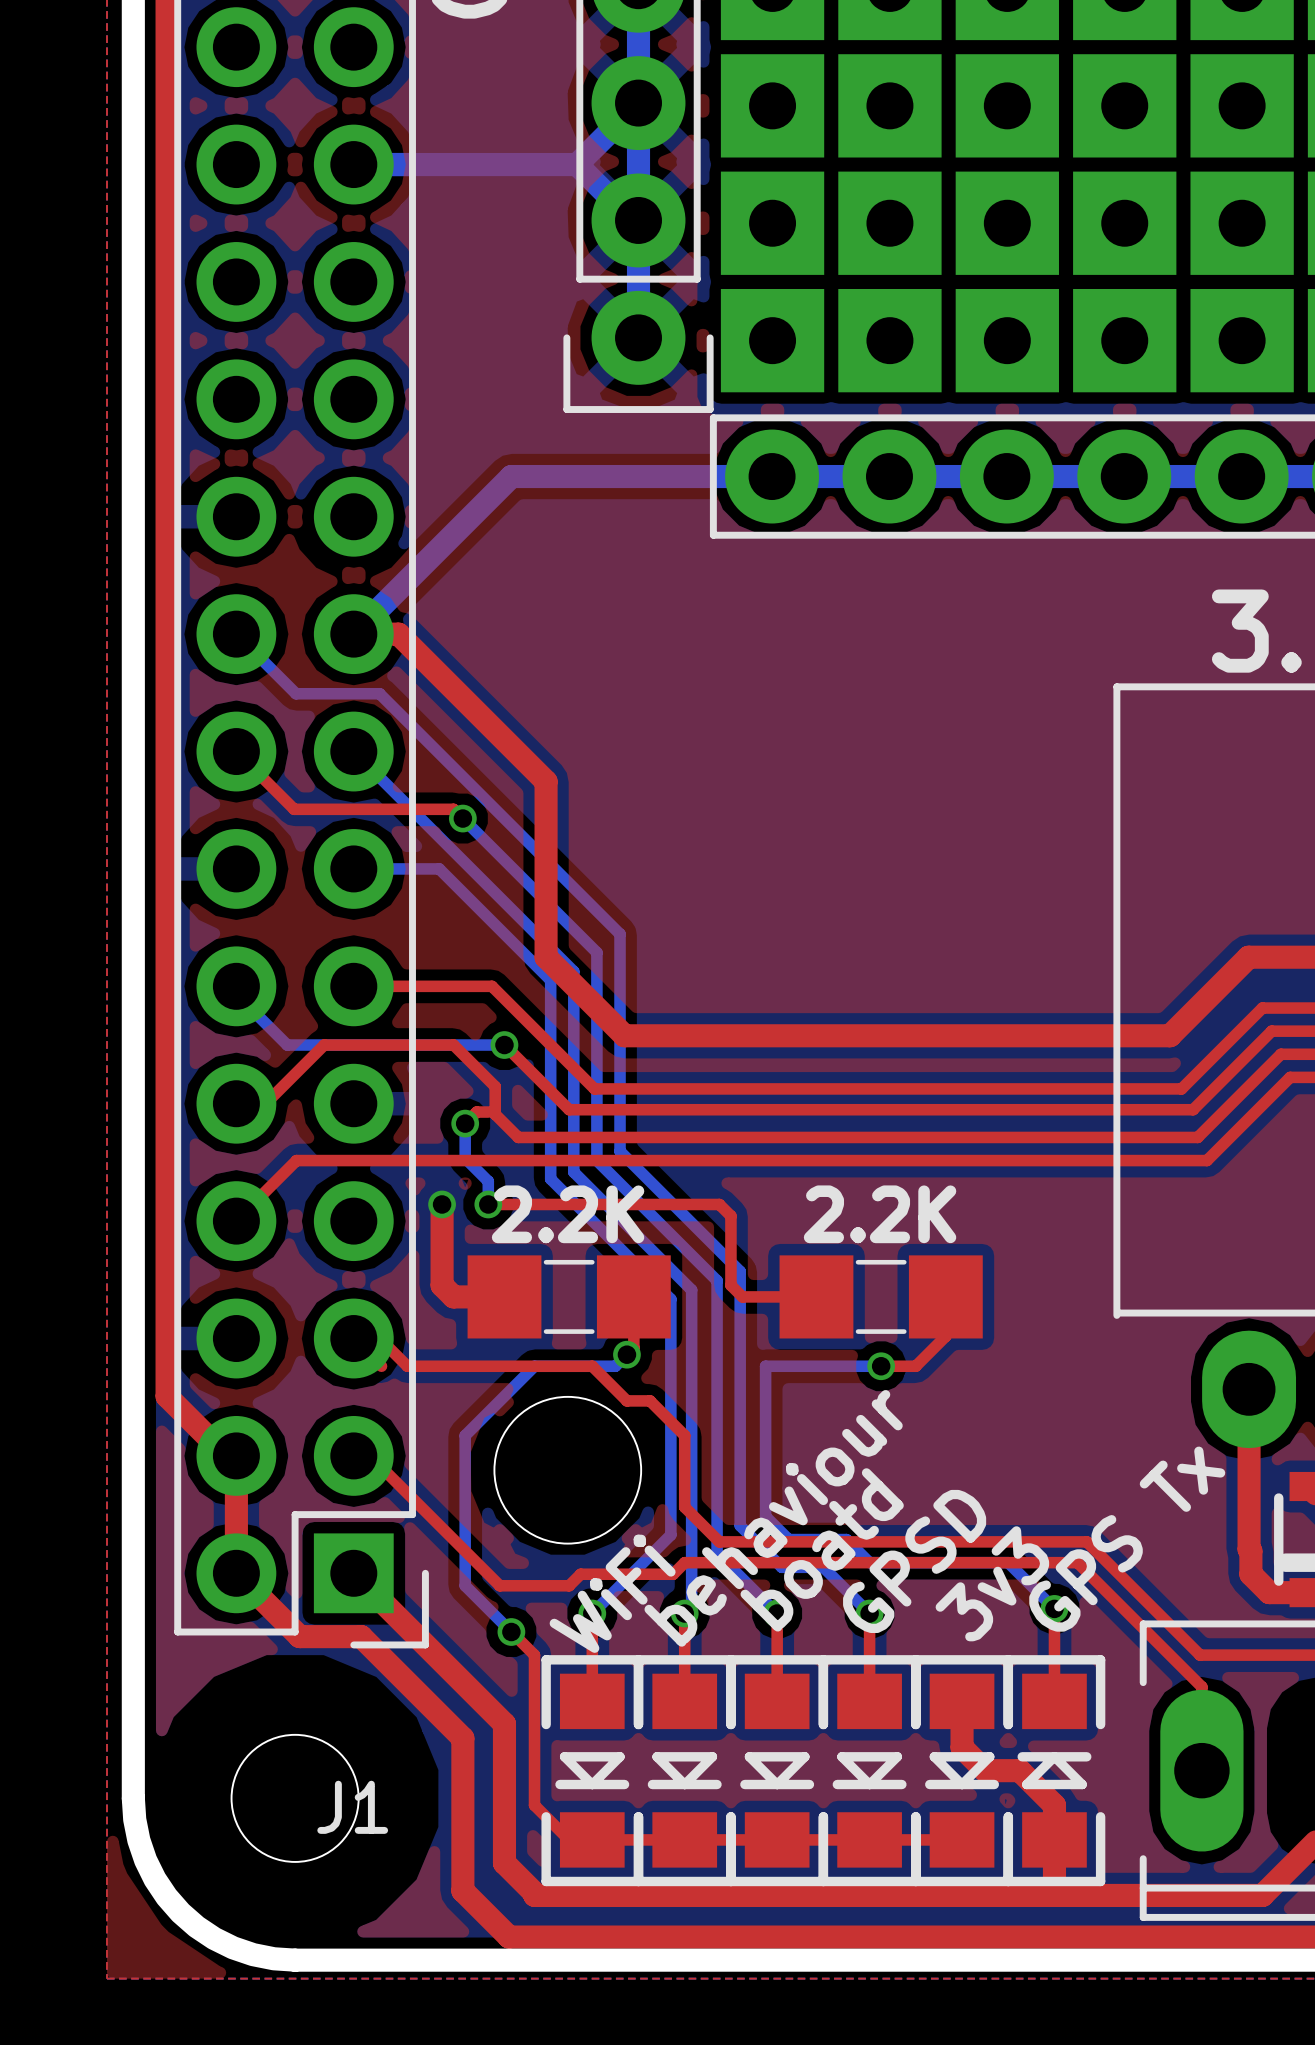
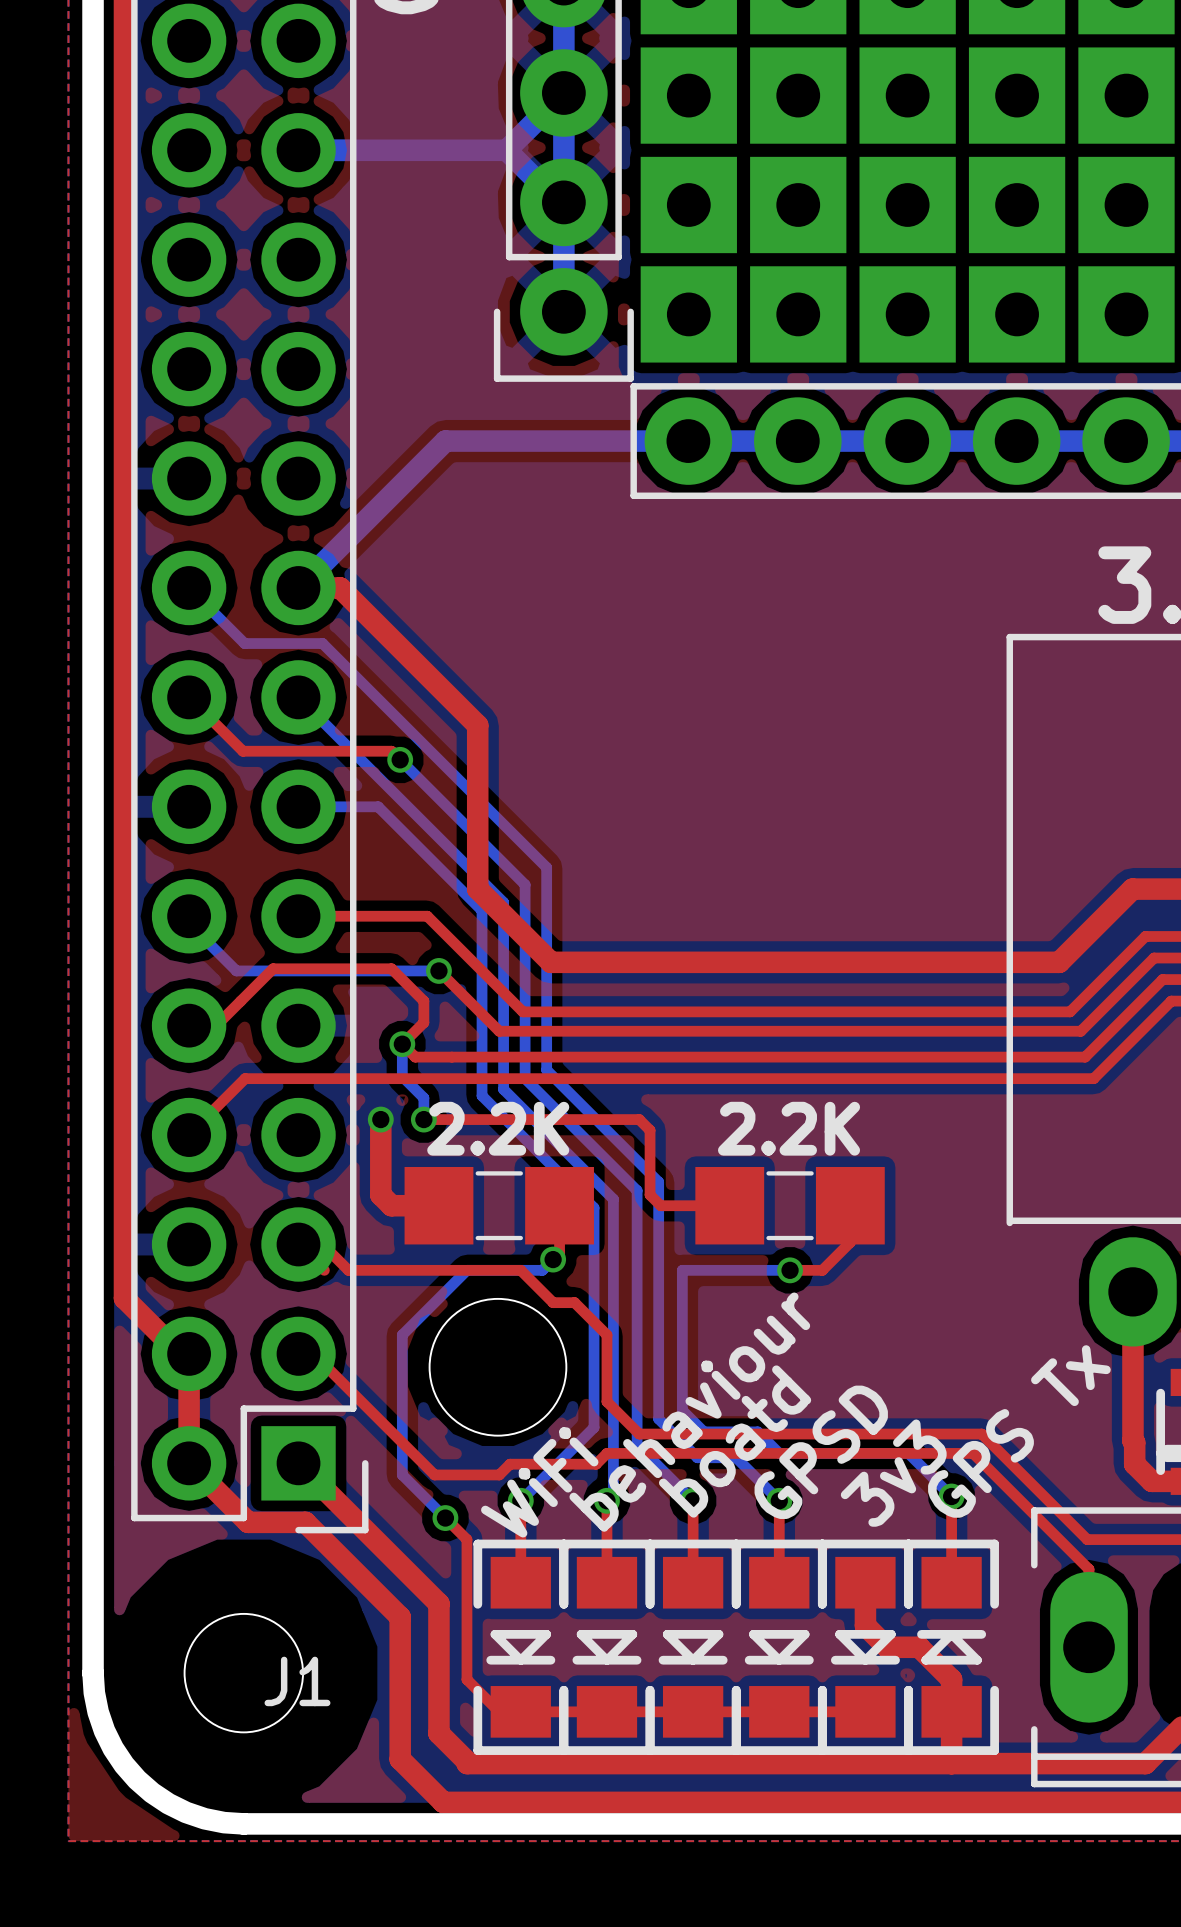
top track: (324, 1045) (453, 1045) (495, 1086) (495, 1114) (518, 1137) -> (270, 970) (273, 968) (391, 968) (423, 1001) (423, 1022) (413, 1033)
top track: (476, 1112) (488, 1112) -> none
top track: none -> (402, 1044) (415, 1057) (451, 1057)

